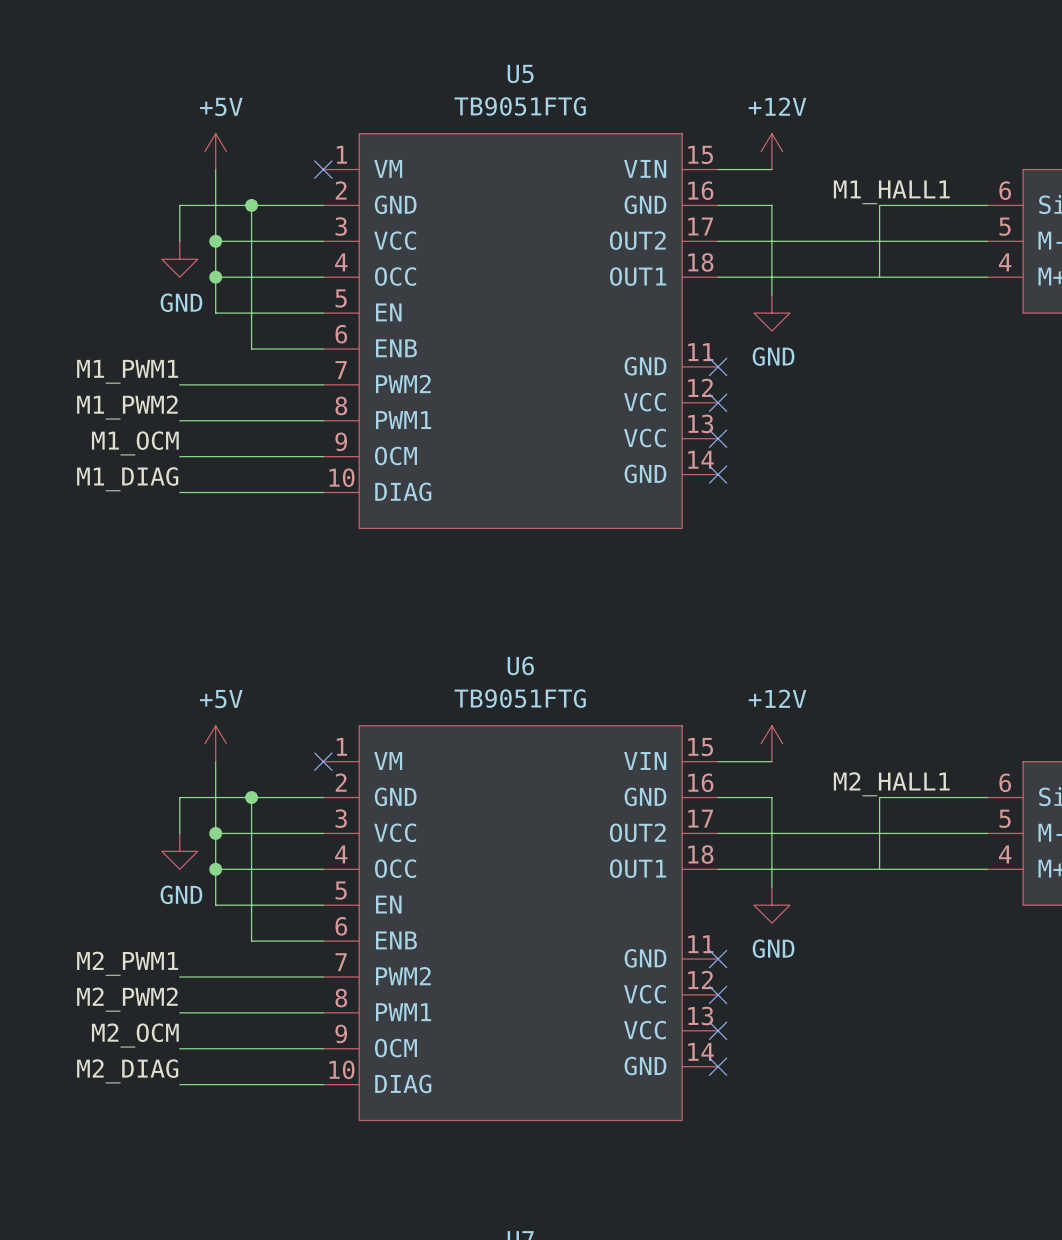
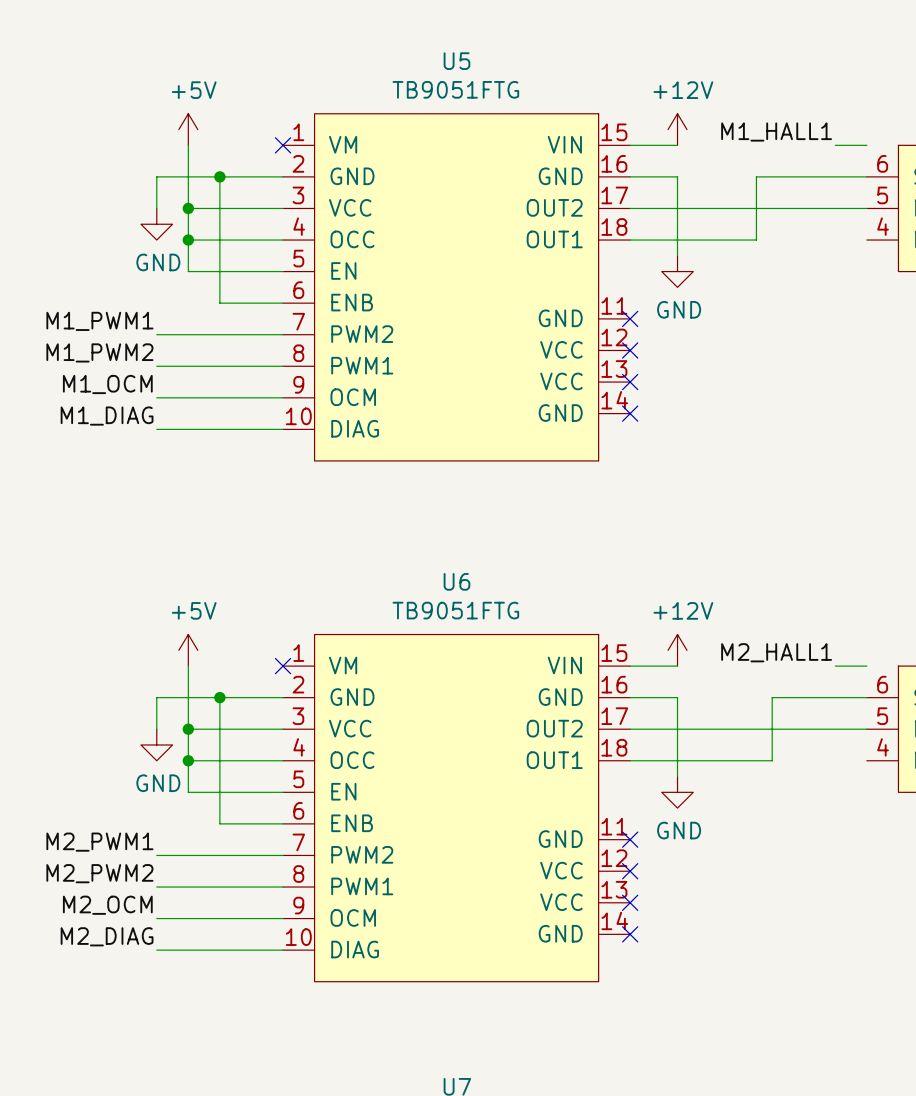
wire: none -> (835, 145) (866, 145)
label position: M1_HALL1 (891, 192) -> M1_HALL1 (776, 132)
wire: (879, 205) (879, 277) -> (772, 176) (756, 176) (756, 240)
wire: (861, 277) (987, 277) -> none
wire: none -> (835, 666) (866, 666)
label position: M2_HALL1 (891, 784) -> M2_HALL1 (776, 652)
wire: (879, 869) (987, 869) -> none

